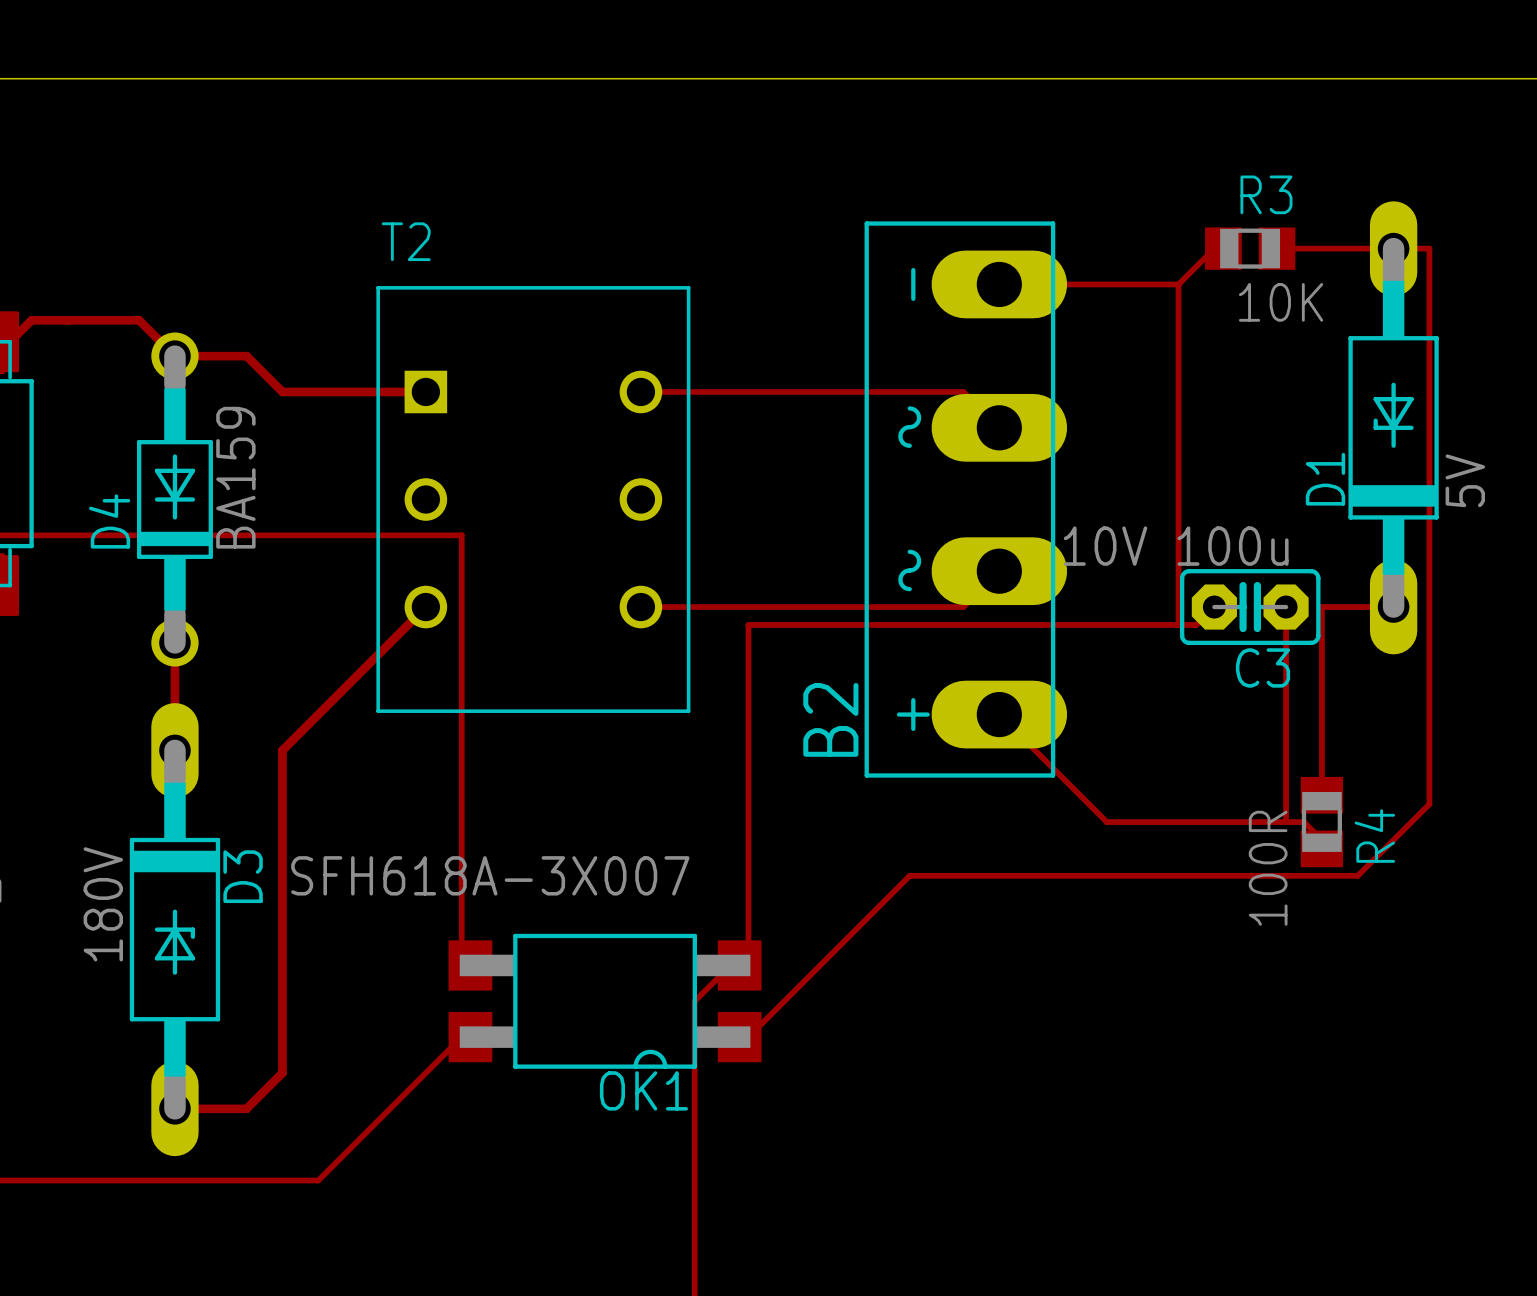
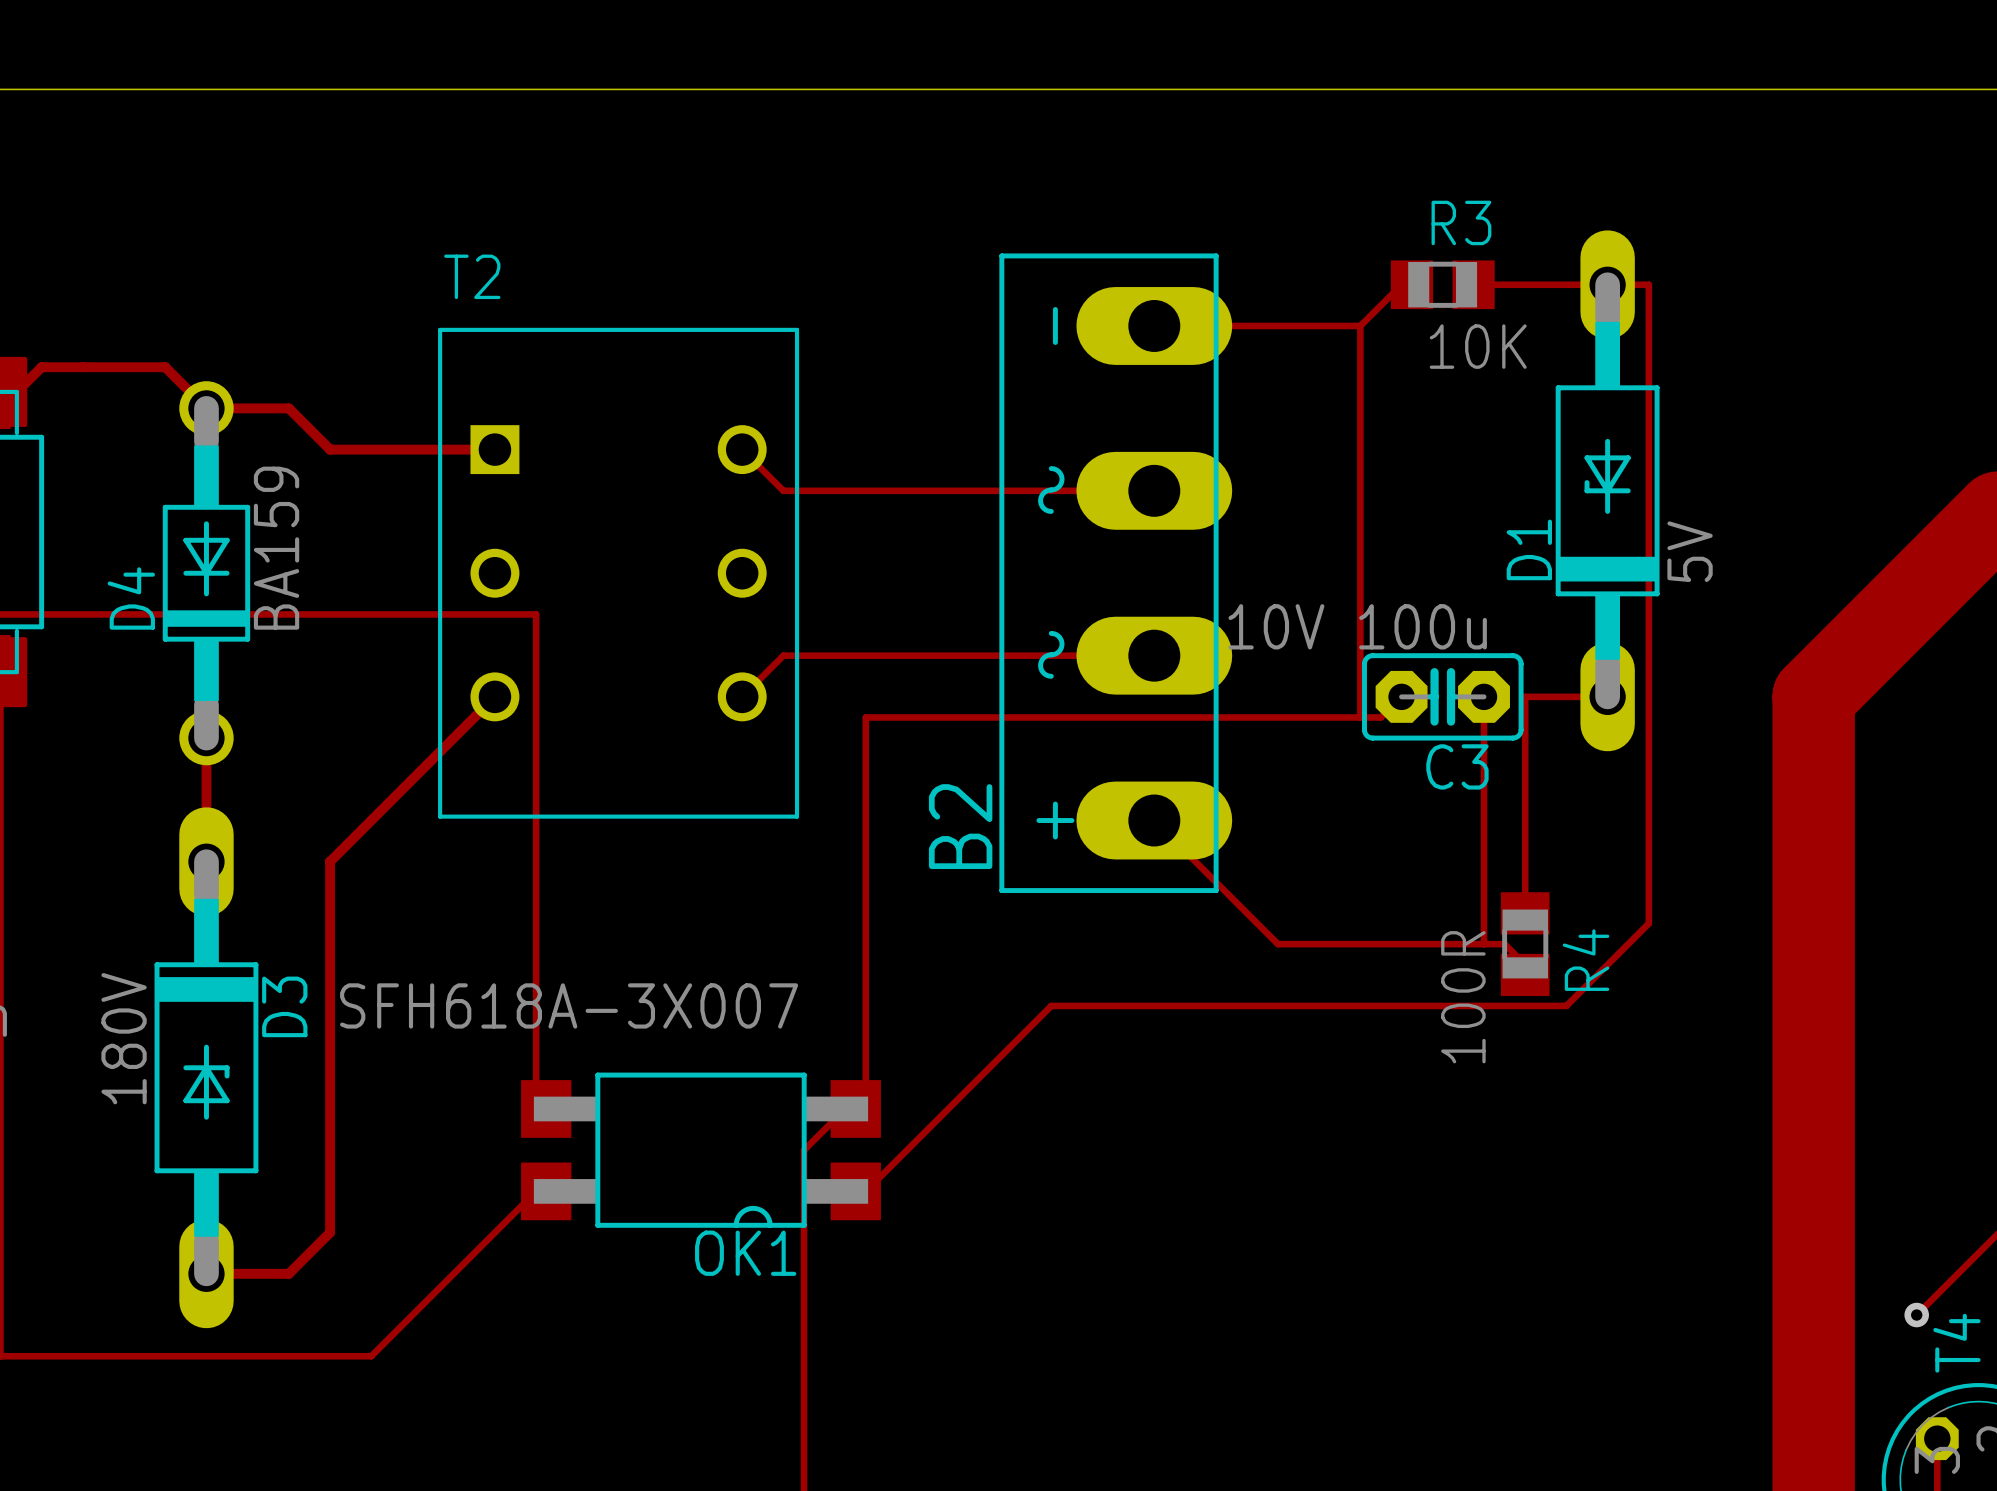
track: (640, 391) (963, 391) (999, 427) -> (742, 449) (783, 490) (1154, 490)
track: (999, 571) (963, 607) (640, 607) -> (1154, 655) (783, 655) (742, 696)

